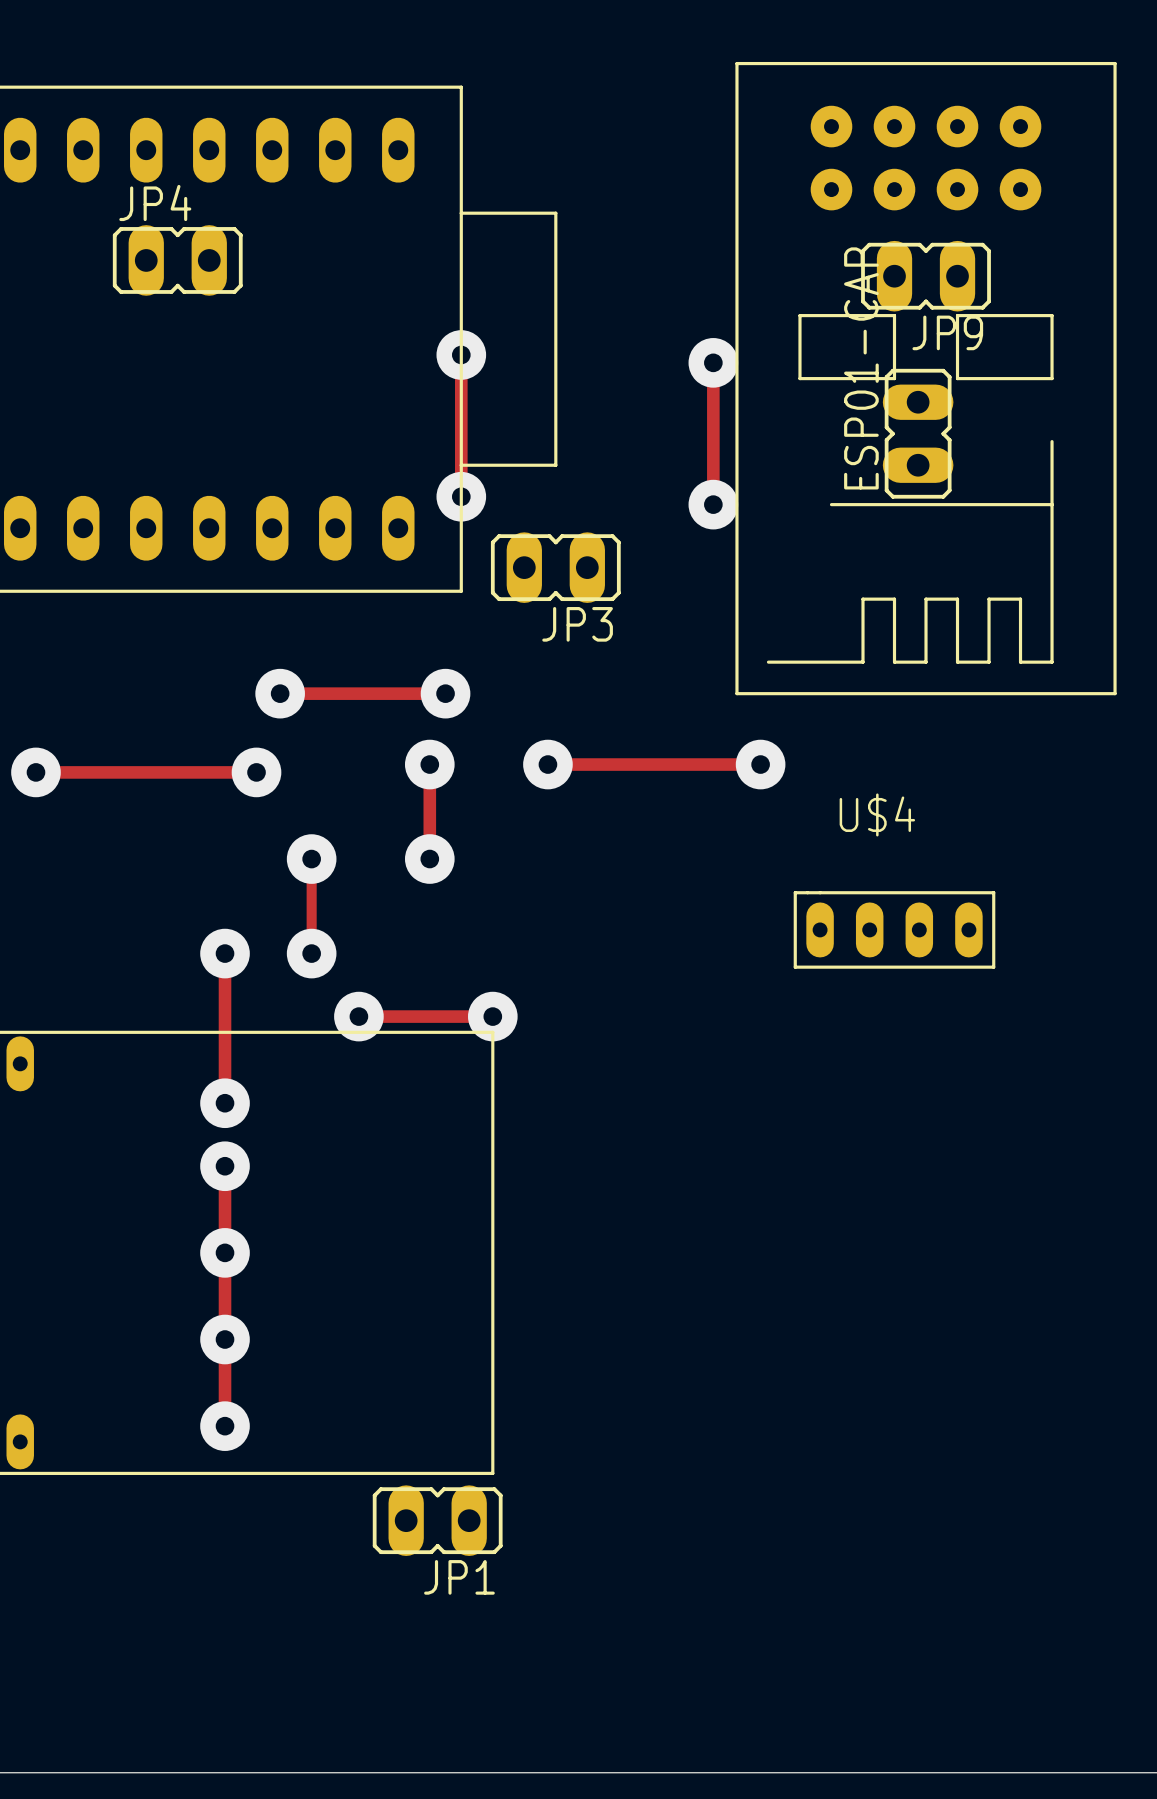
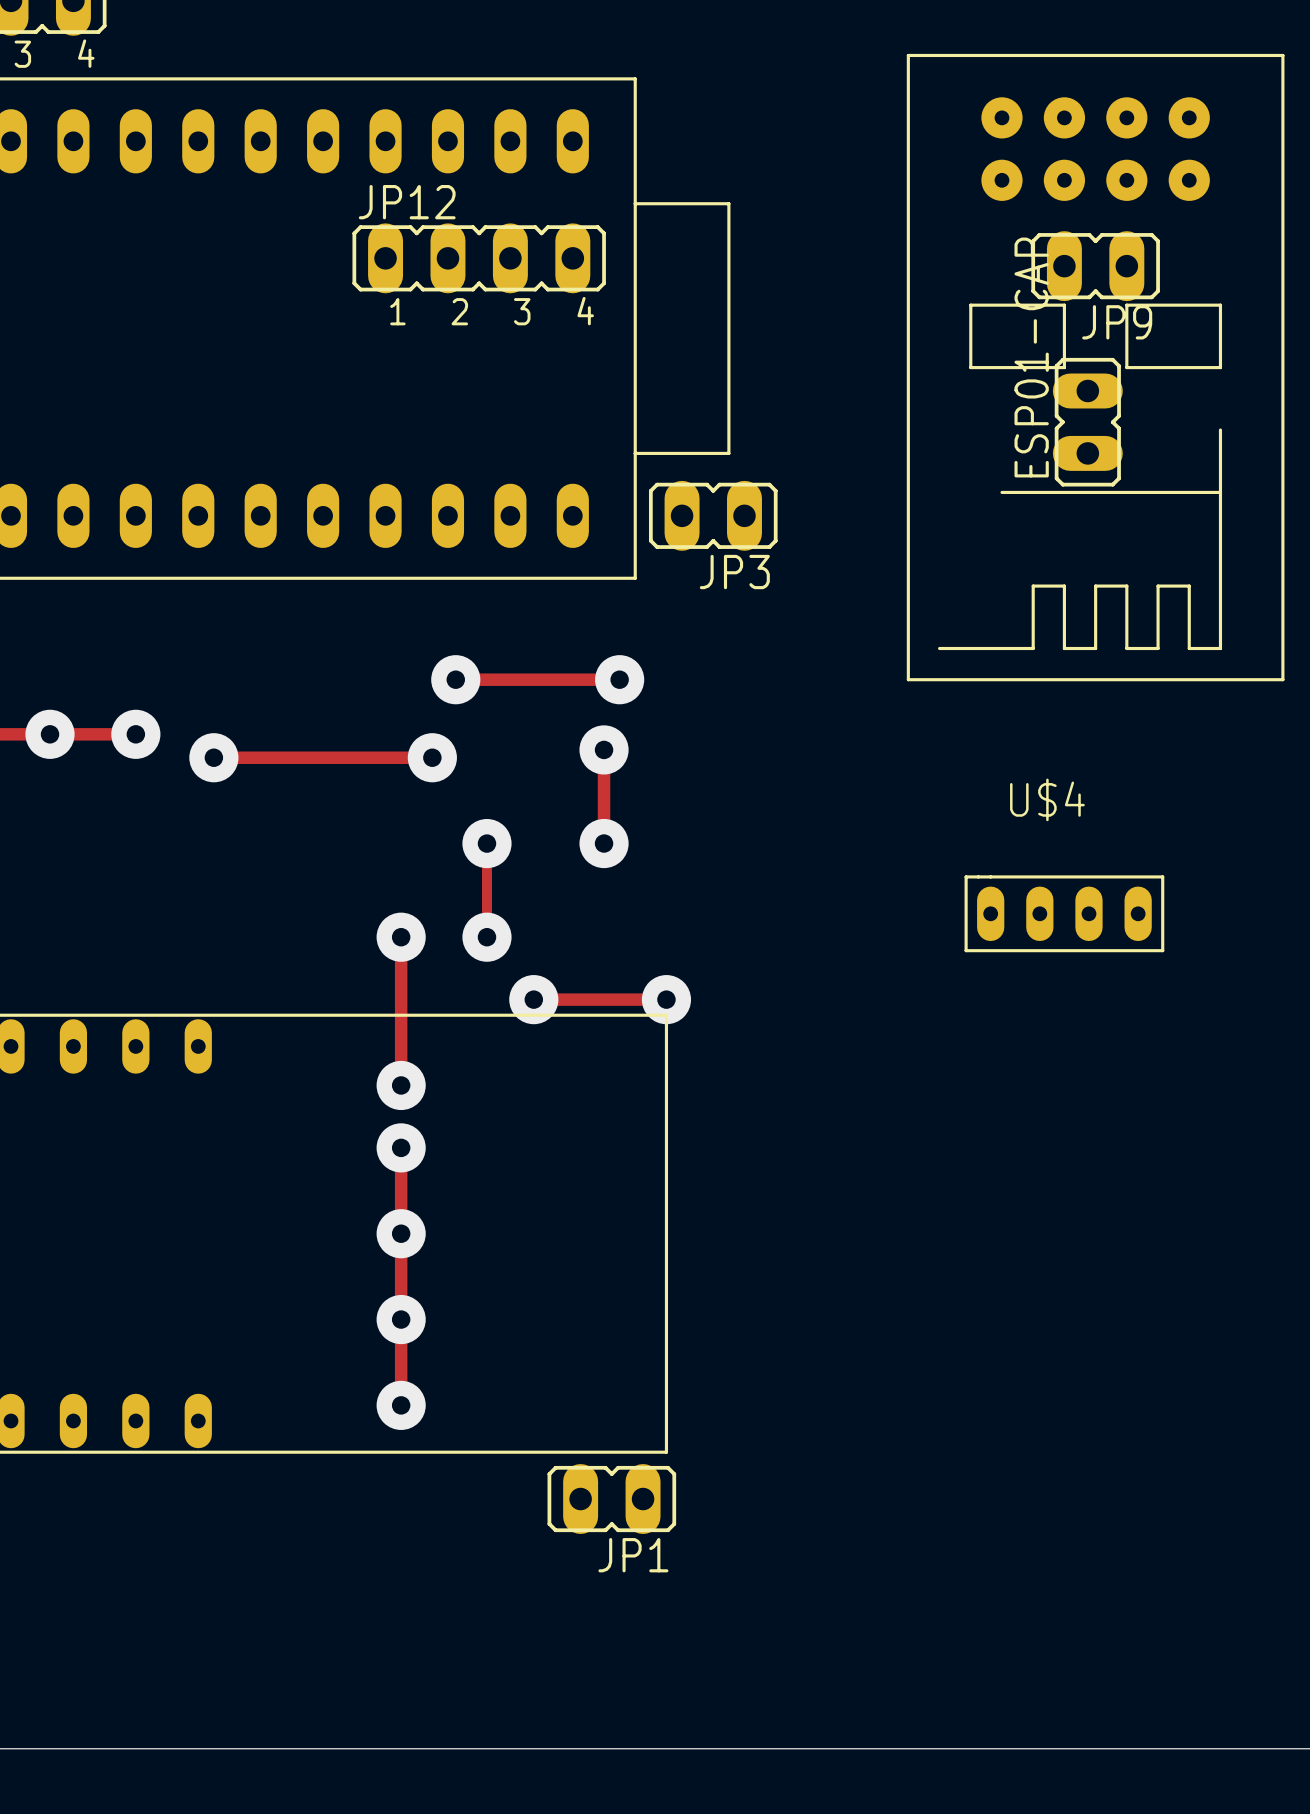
JP4: (177, 260) -> none
JP12: none -> (479, 258)
track: (461, 354) (461, 496) -> none
via: (461, 354) -> none
track: (713, 362) (713, 504) -> none
via: (713, 362) -> none
via: (461, 496) -> none
via: (713, 504) -> none
JP3 position: (555, 567) -> (713, 515)
track: (547, 764) (760, 764) -> none
via: (547, 764) -> none
via: (760, 764) -> none

